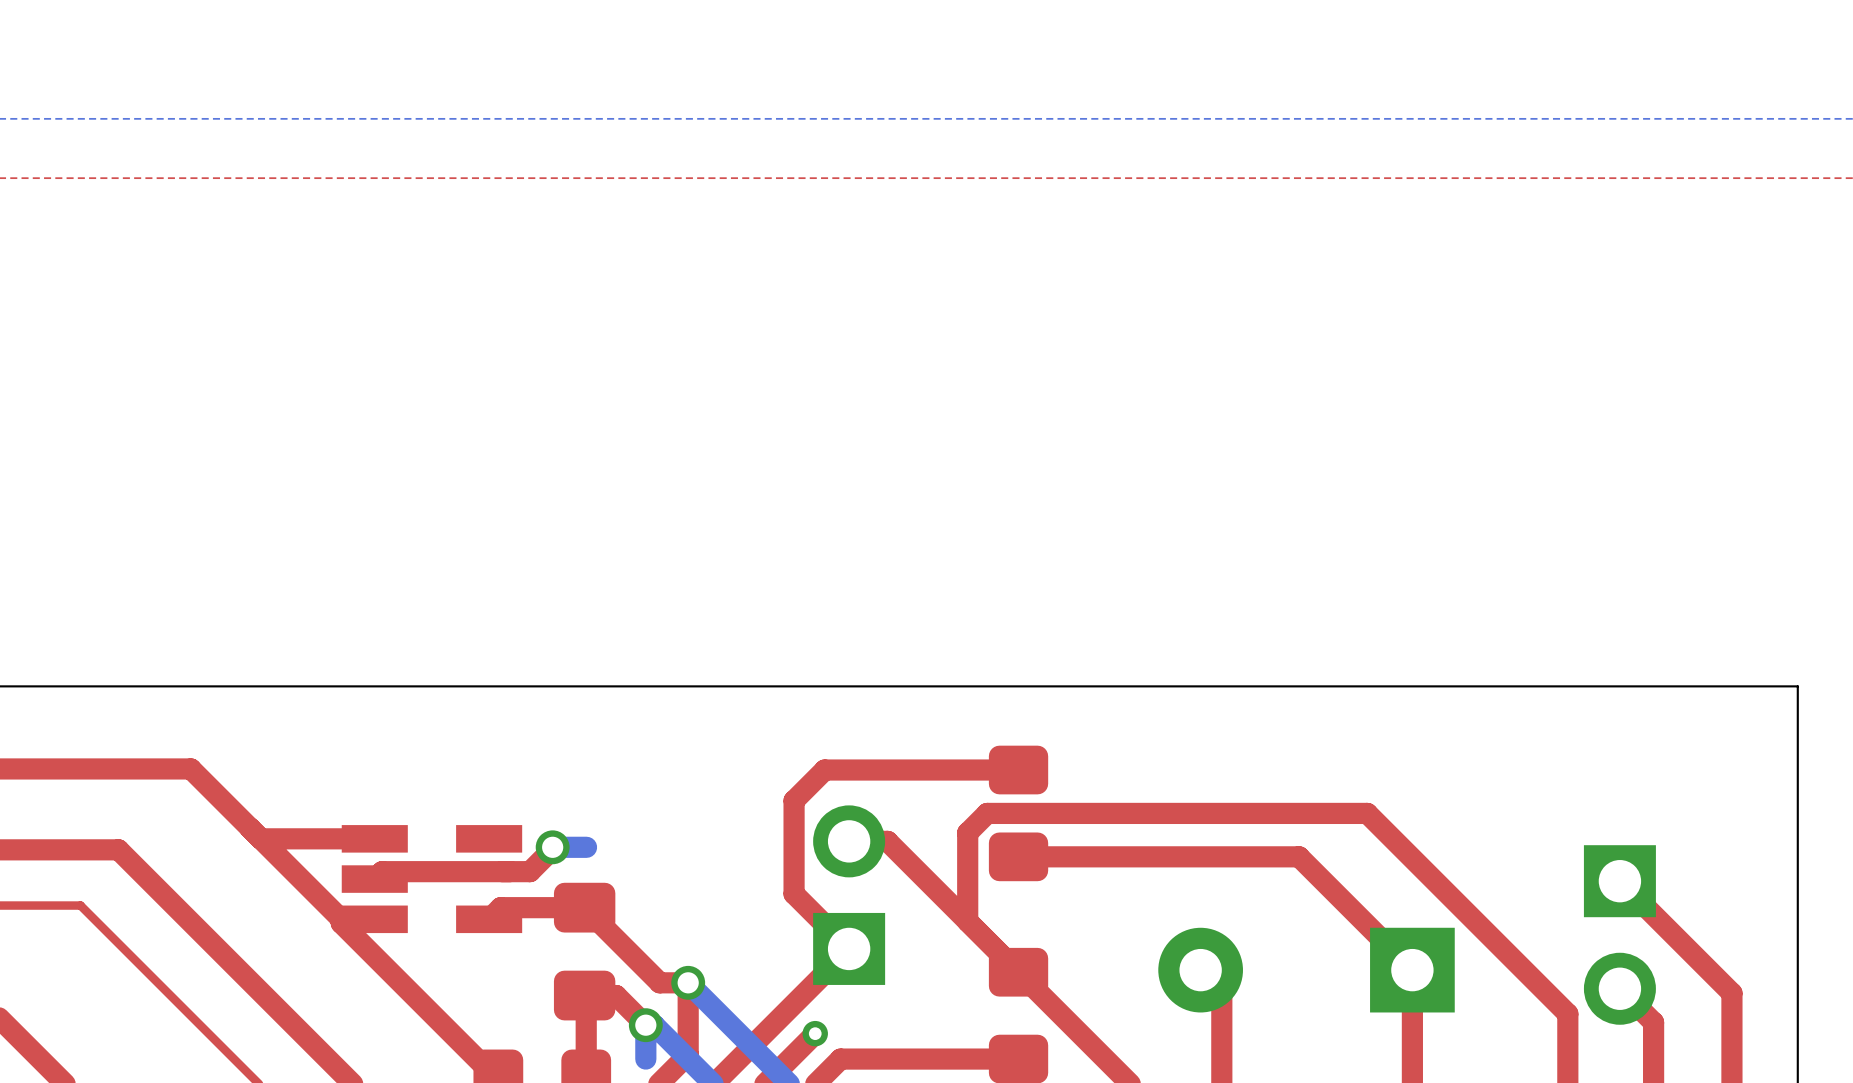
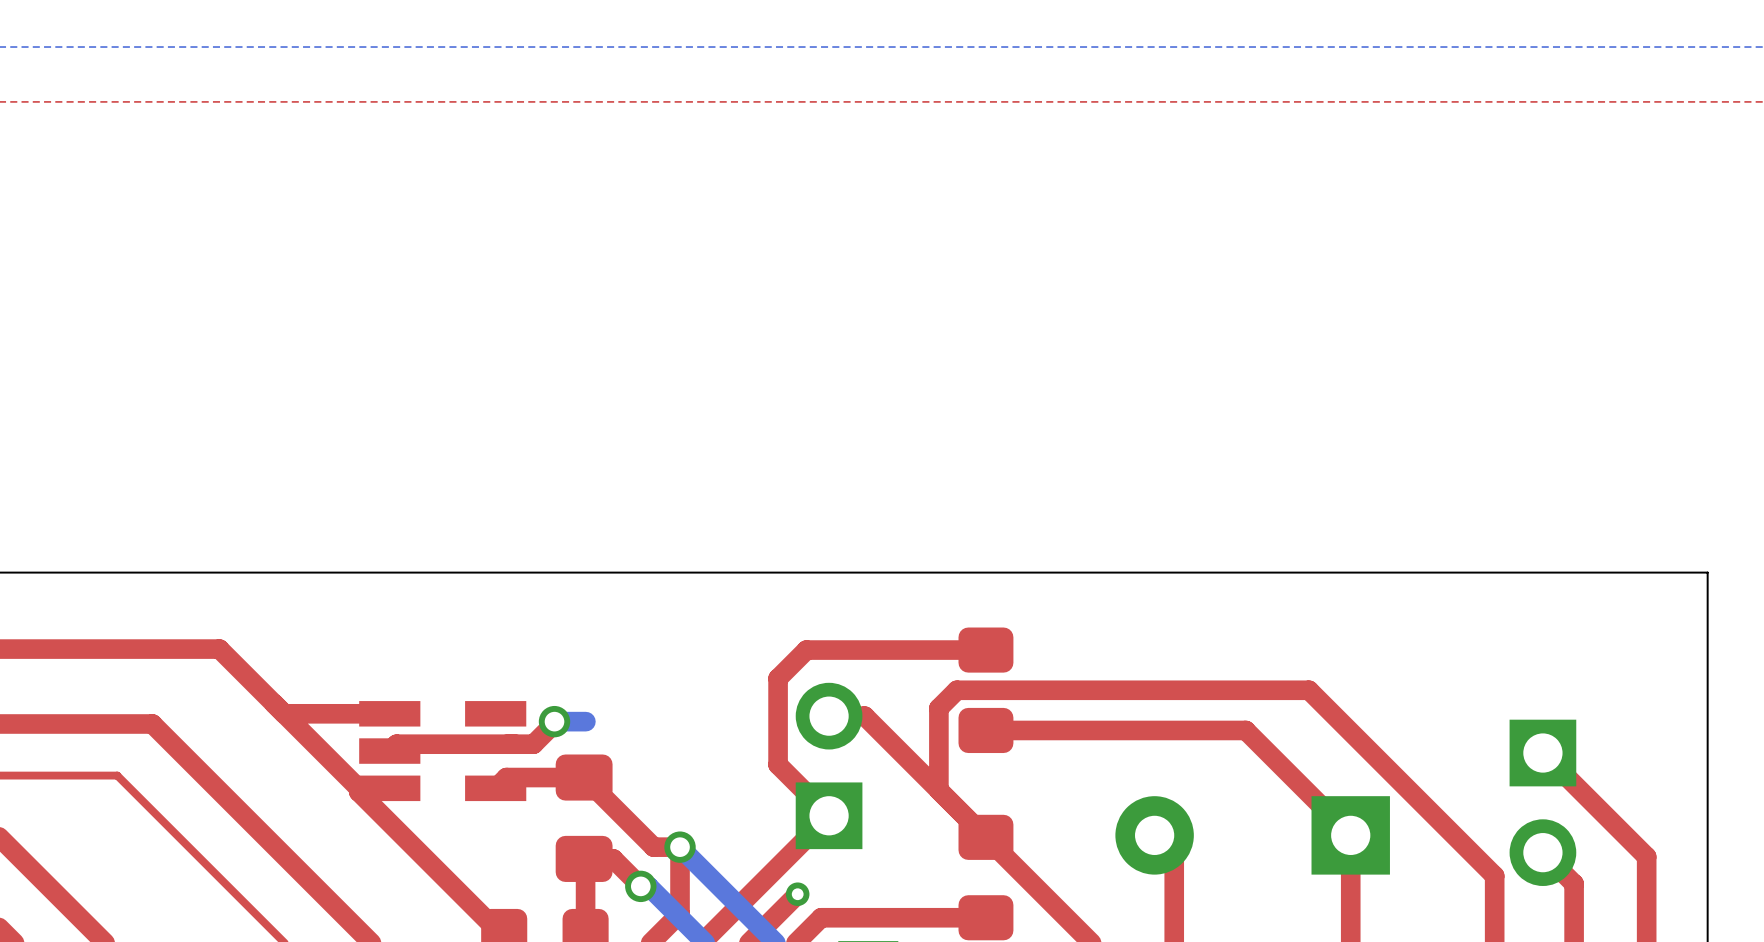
bottom track: (645, 1025) (645, 1059) -> none

